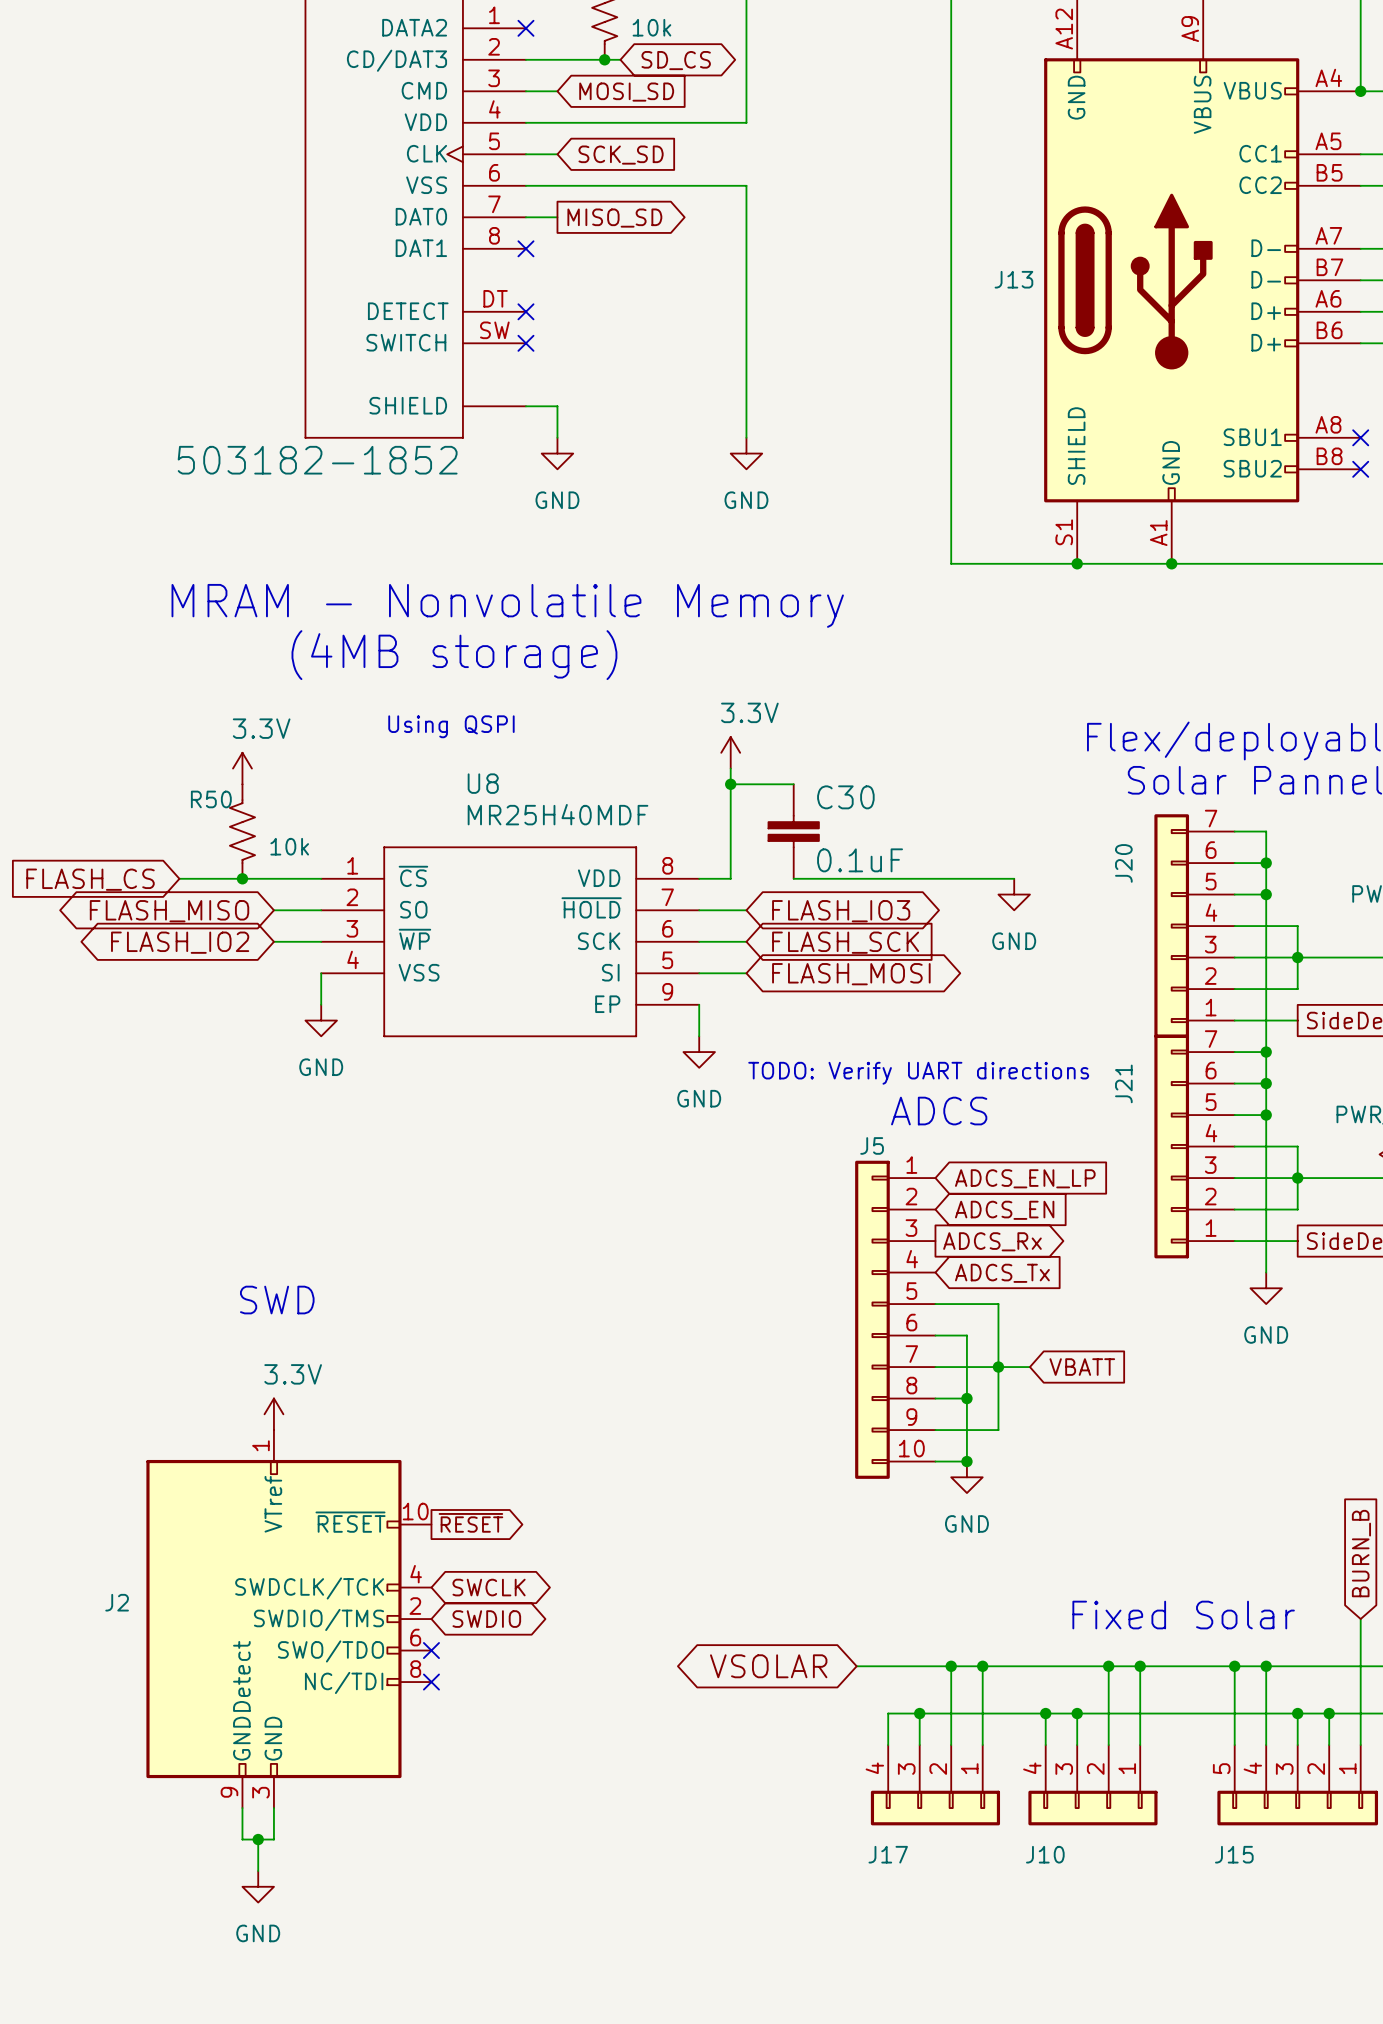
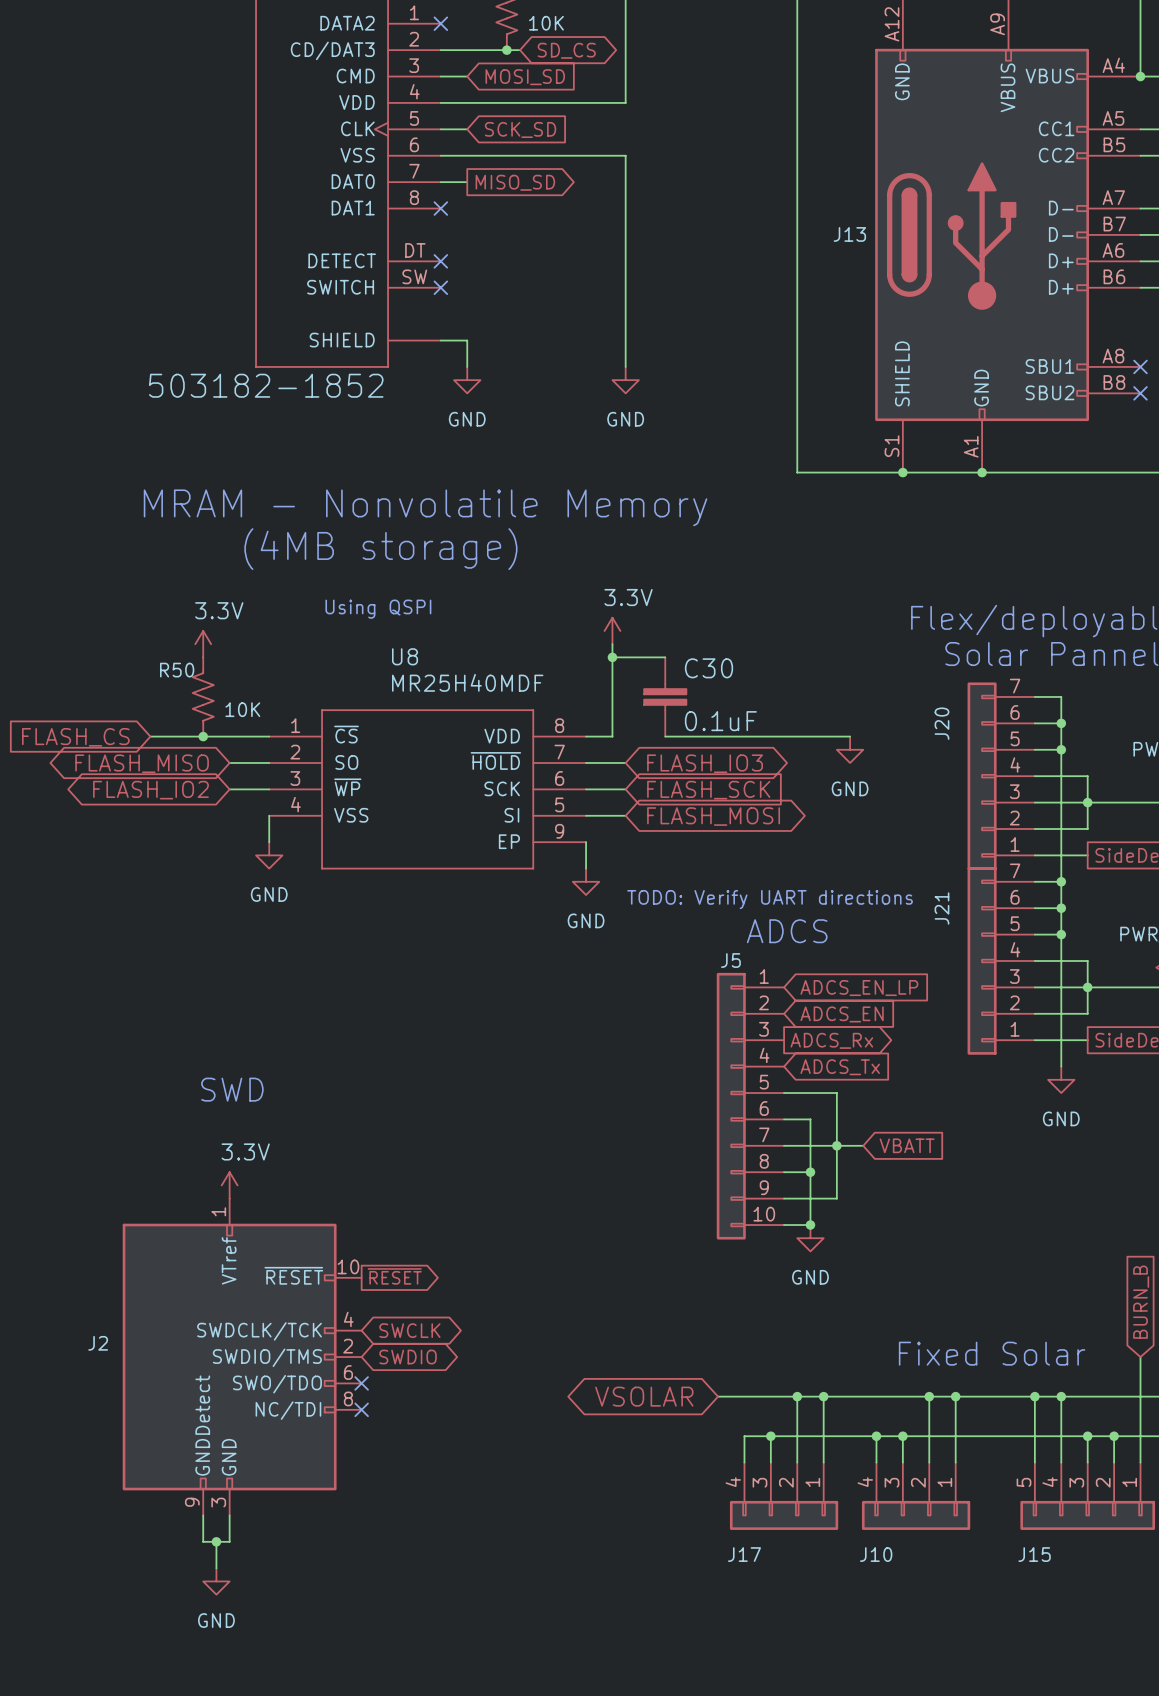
part value: 10k (651, 27) -> 10K (546, 23)
R50 value: 10k (289, 846) -> 10K (242, 709)

